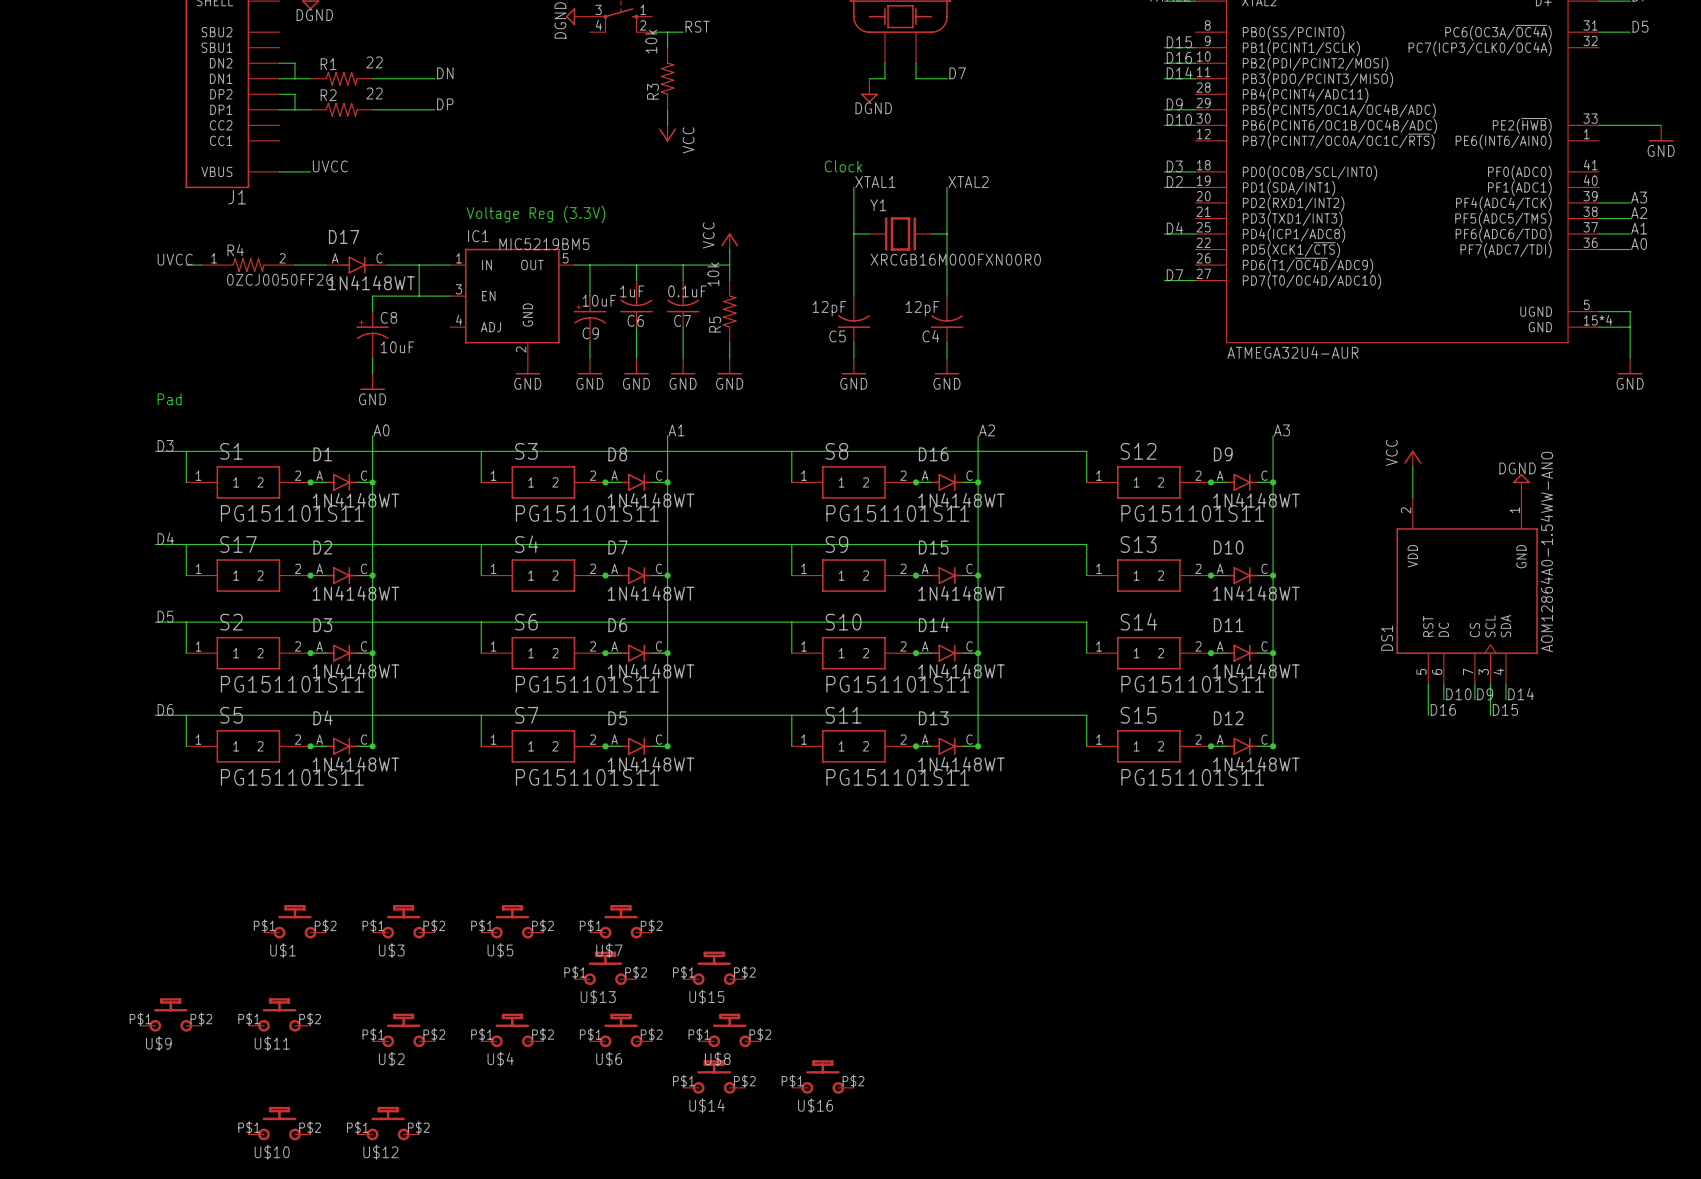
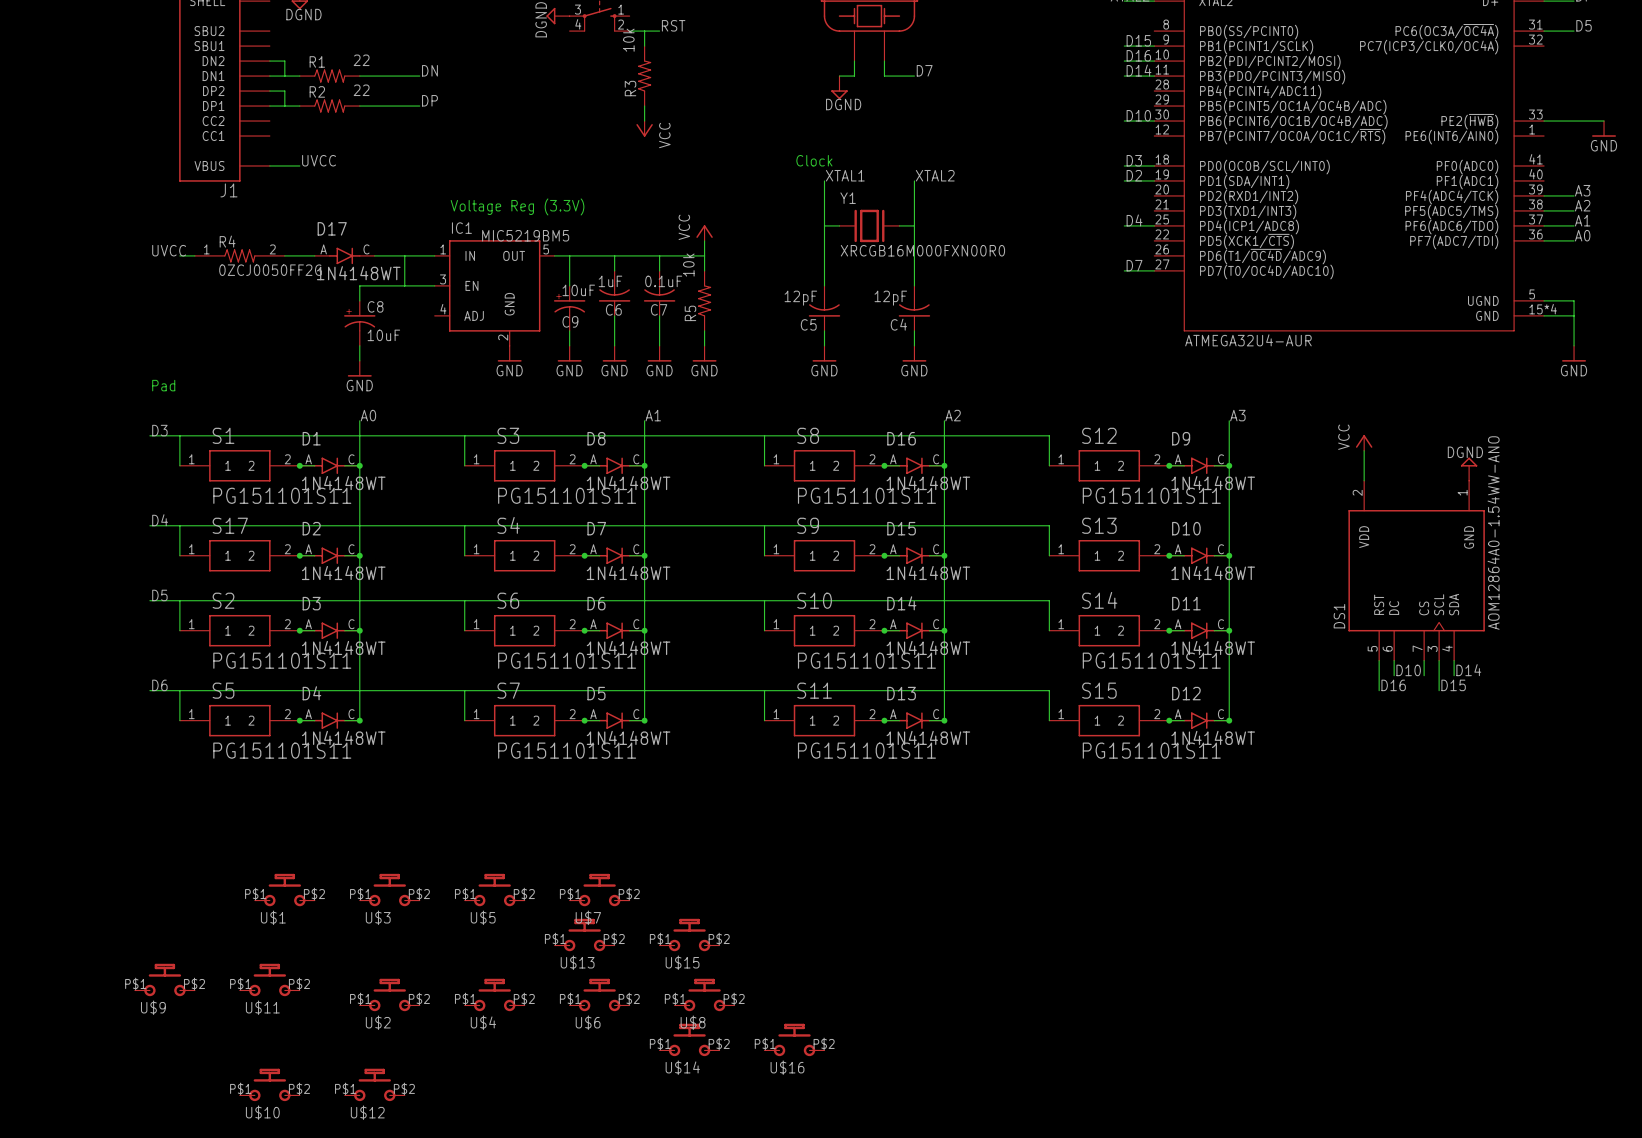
label: D9 (1174, 104) -> none
wire: (1164, 109) (1195, 109) -> none
label: D9 (1485, 694) -> none

